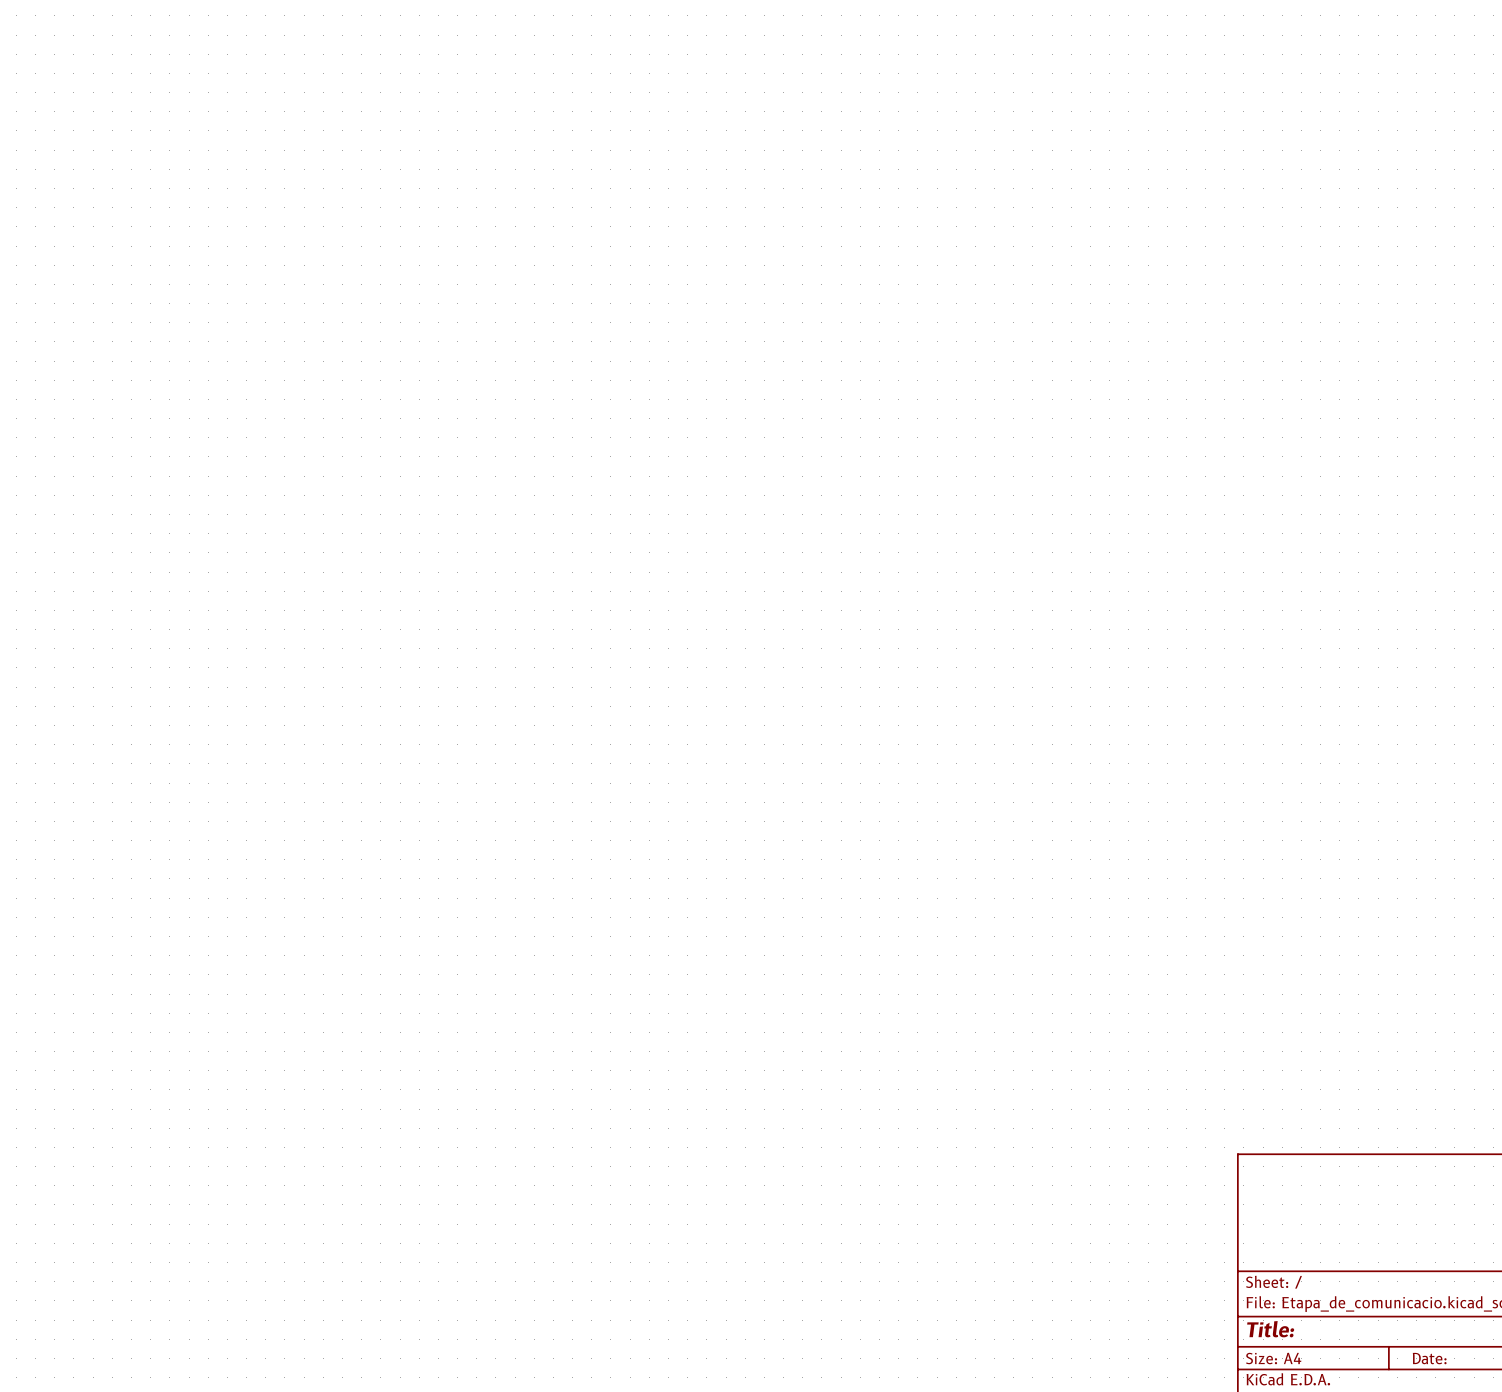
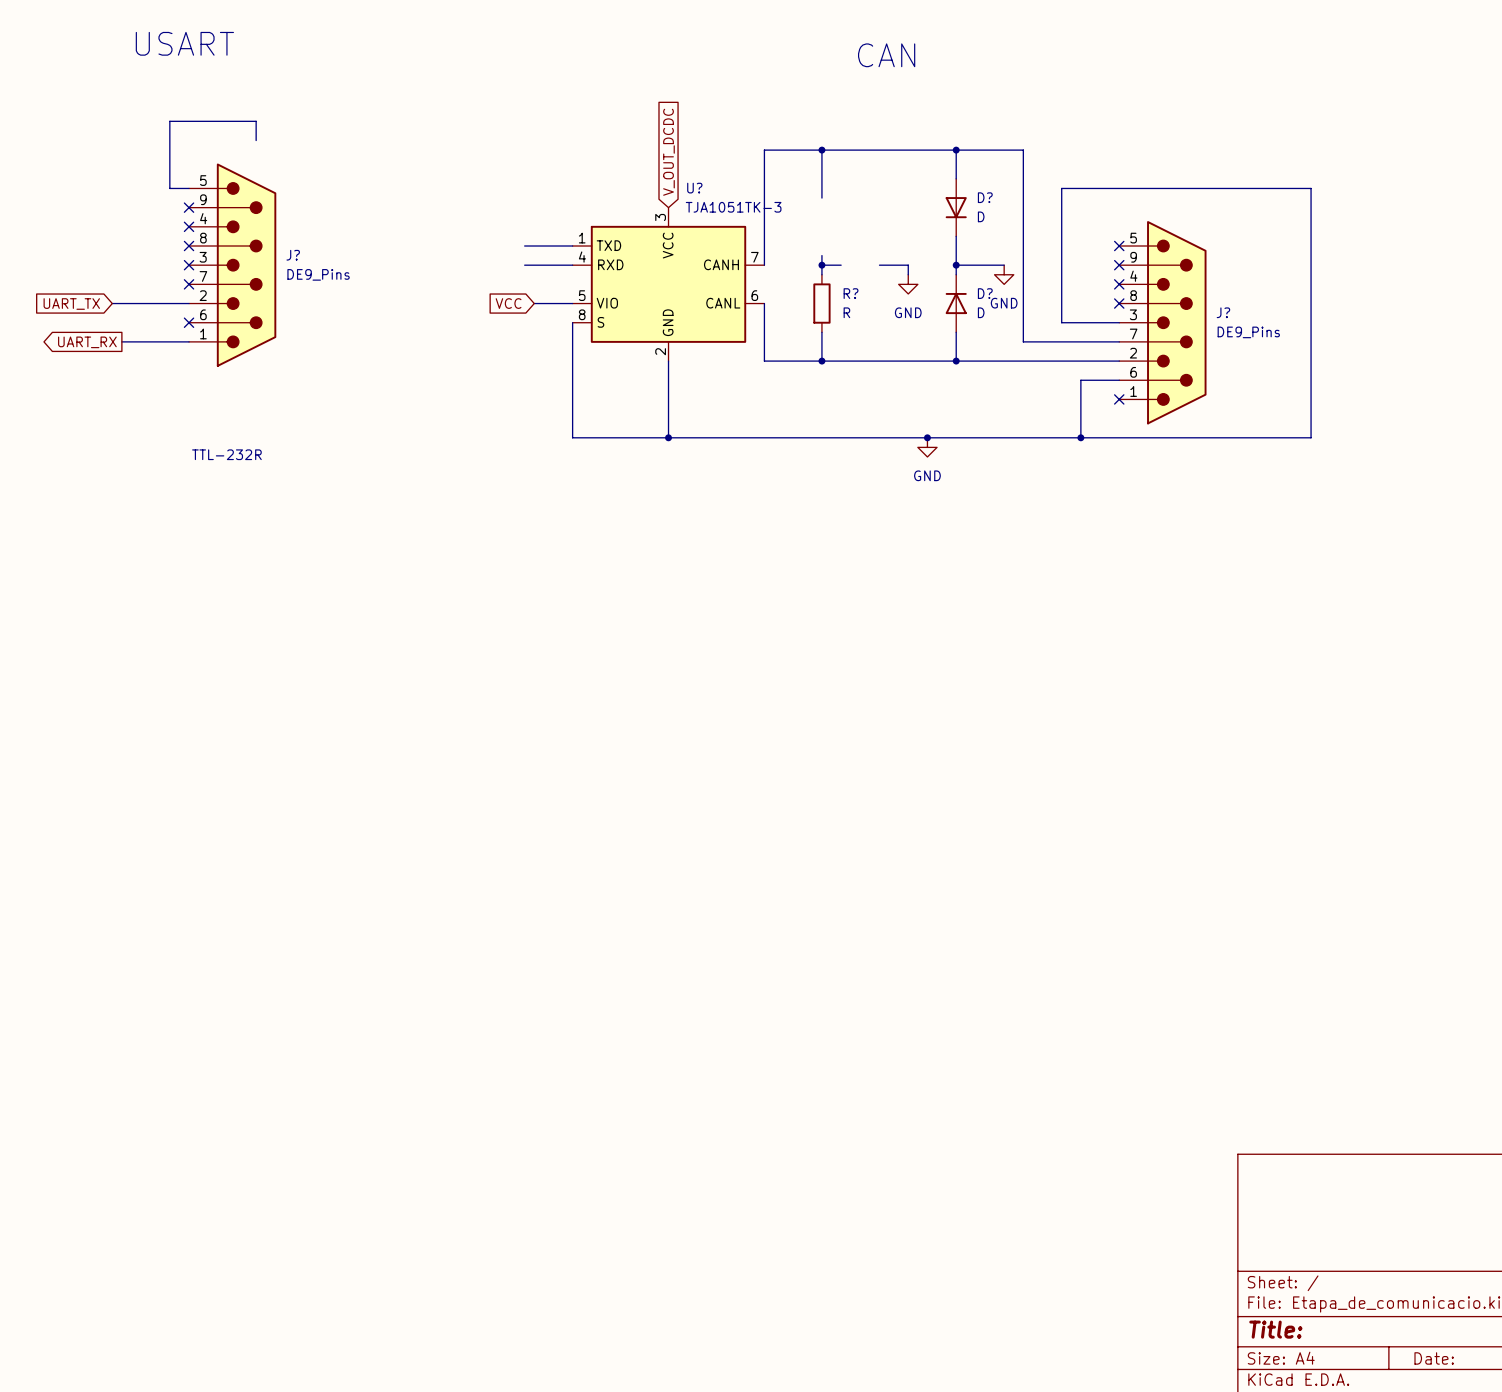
text: none -> USART (184, 43)
text: none -> CAN (886, 55)
wire: none -> (256, 140) (256, 121) (169, 121) (169, 188) (189, 188)
wire: none -> (821, 150) (821, 198)
junction: none -> (821, 150)
wire: none -> (956, 150) (956, 178)
junction: none -> (956, 150)
global label: none -> V_OUT_DCDC (668, 152)
no-connect mark: none -> (189, 207)
D?: none -> D (956, 207)
no-connect mark: none -> (189, 226)
wire: none -> (956, 236) (956, 274)
no-connect mark: none -> (189, 246)
wire: none -> (524, 246) (572, 246)
no-connect mark: none -> (1119, 246)
wire: none -> (821, 255) (821, 274)
no-connect mark: none -> (189, 265)
J?: none -> DE9_Pins (232, 265)
wire: none -> (524, 265) (572, 265)
wire: none -> (764, 265) (764, 150) (1023, 150) (1023, 341) (1119, 341)
wire: none -> (821, 265) (841, 265)
junction: none -> (821, 265)
wire: none -> (879, 265) (908, 265) (908, 274)
wire: none -> (956, 265) (1004, 265)
junction: none -> (956, 265)
no-connect mark: none -> (1119, 265)
power symbol: none -> GND (1004, 274)
no-connect mark: none -> (189, 284)
U?: none -> TJA1051TK-3 (668, 284)
power symbol: none -> GND (908, 284)
no-connect mark: none -> (1119, 284)
wire: none -> (112, 303) (189, 303)
global label: none -> VCC (508, 303)
wire: none -> (534, 303) (572, 303)
wire: none -> (764, 303) (764, 361) (1119, 361)
R?: none -> R (821, 303)
D?: none -> D (956, 303)
no-connect mark: none -> (1119, 303)
global label: none -> UART_TX (71, 304)
no-connect mark: none -> (189, 322)
wire: none -> (572, 322) (572, 437) (1311, 437) (1311, 188) (1061, 188) (1061, 322) (1119, 322)
J?: none -> DE9_Pins (1162, 322)
wire: none -> (821, 332) (821, 361)
wire: none -> (956, 332) (956, 361)
wire: none -> (121, 341) (189, 341)
global label: none -> UART_RX (87, 342)
wire: none -> (668, 361) (668, 437)
junction: none -> (821, 361)
junction: none -> (956, 361)
wire: none -> (1119, 380) (1080, 380) (1080, 437)
no-connect mark: none -> (1119, 399)
junction: none -> (668, 437)
junction: none -> (927, 437)
junction: none -> (1080, 437)
power symbol: none -> GND (927, 447)
text: none -> TTL-232R (226, 454)

